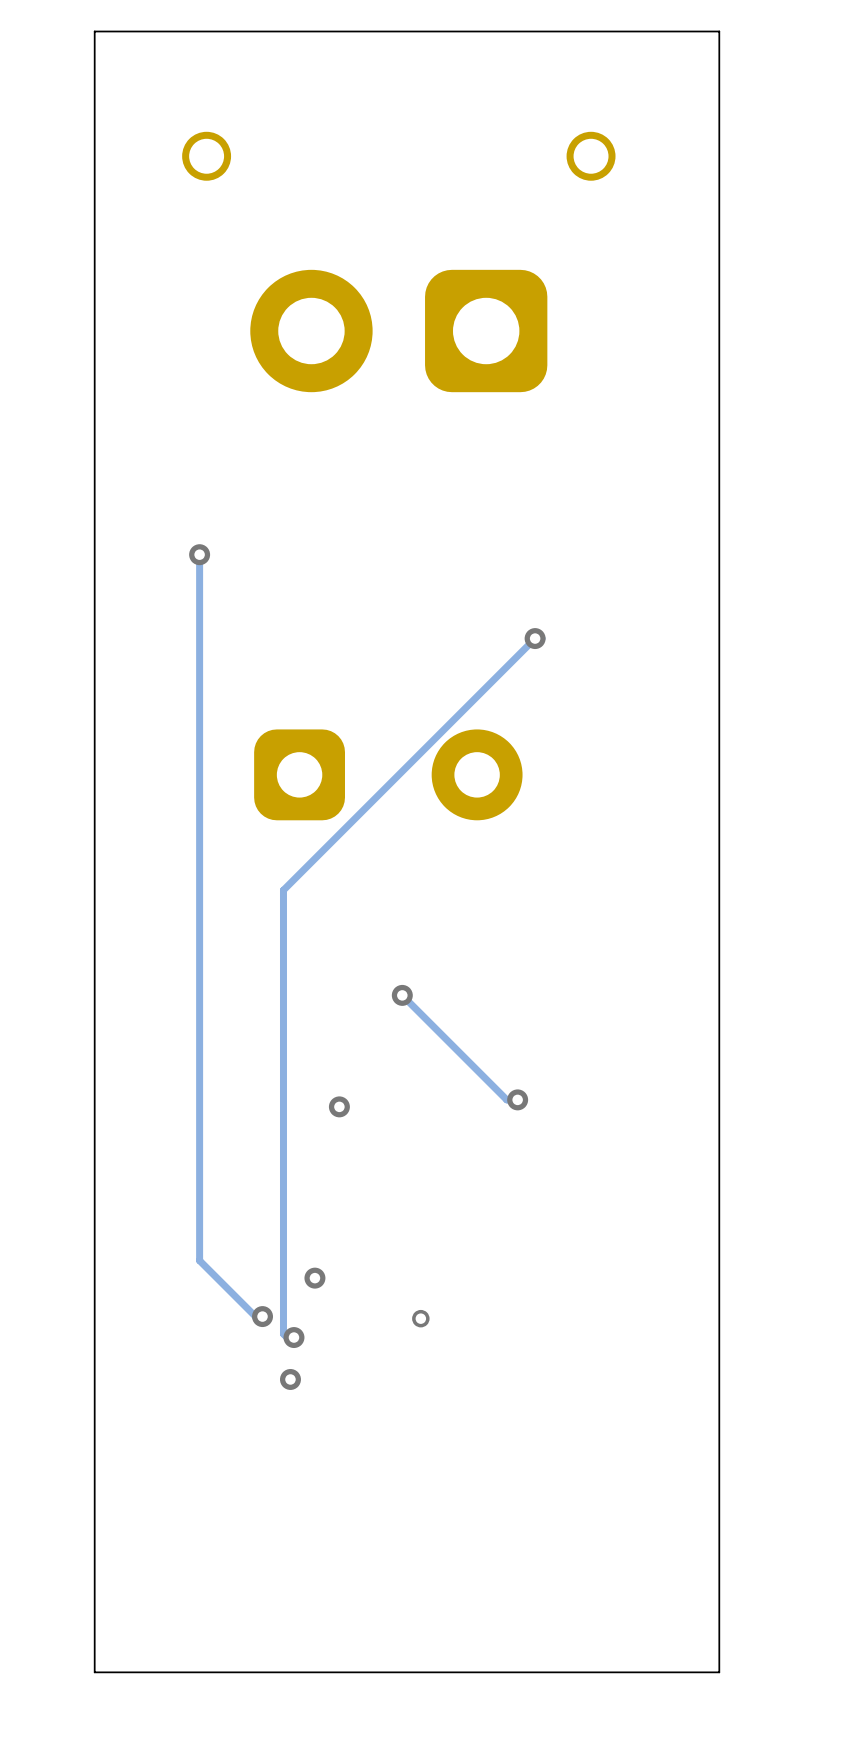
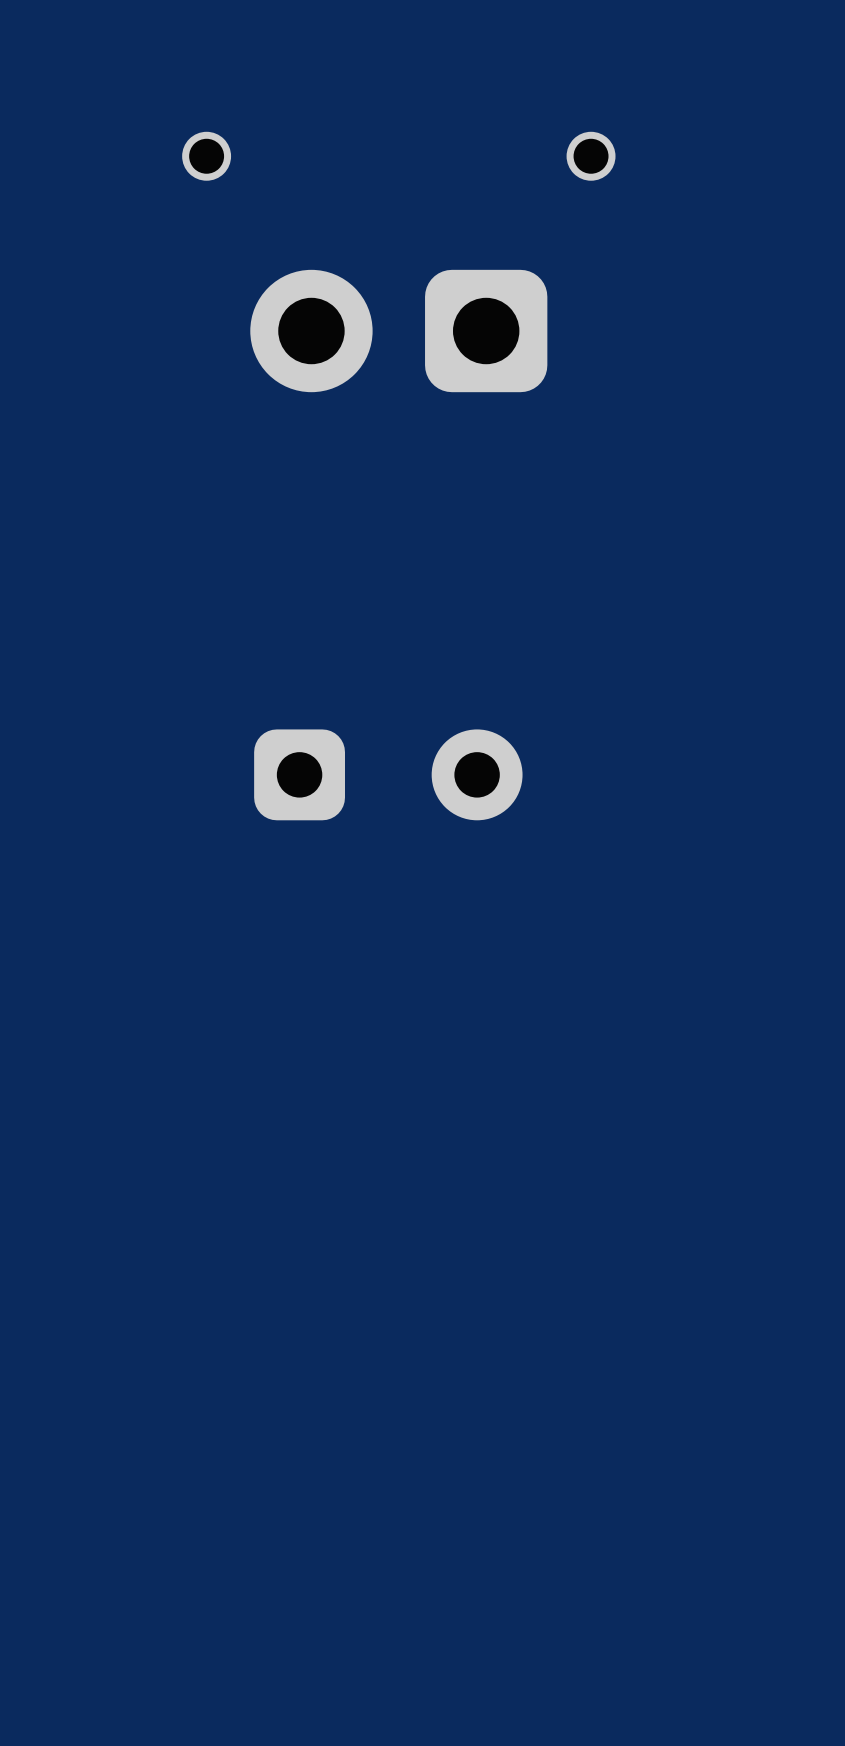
board edge: (719, 31) (94, 31) (94, 1672) (719, 1672) (719, 31) -> none
track: (199, 554) (199, 1260) (255, 1316) (262, 1316) -> none
via: (199, 554) -> none
via: (535, 638) -> none
track: (542, 638) (535, 638) (283, 890) (283, 1334) (286, 1337) (293, 1337) -> none
track: (402, 995) (506, 1099) (517, 1099) -> none
via: (402, 995) -> none
via: (517, 1099) -> none
via: (339, 1106) -> none
via: (314, 1278) -> none
via: (262, 1316) -> none
via: (420, 1318) -> none
via: (293, 1337) -> none
via: (290, 1379) -> none

